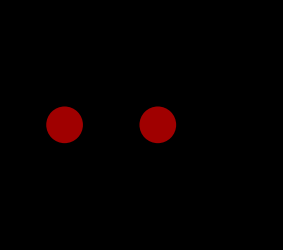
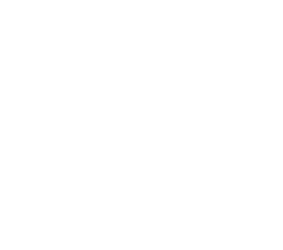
part: (64, 124) -> none
part: (157, 124) -> none

